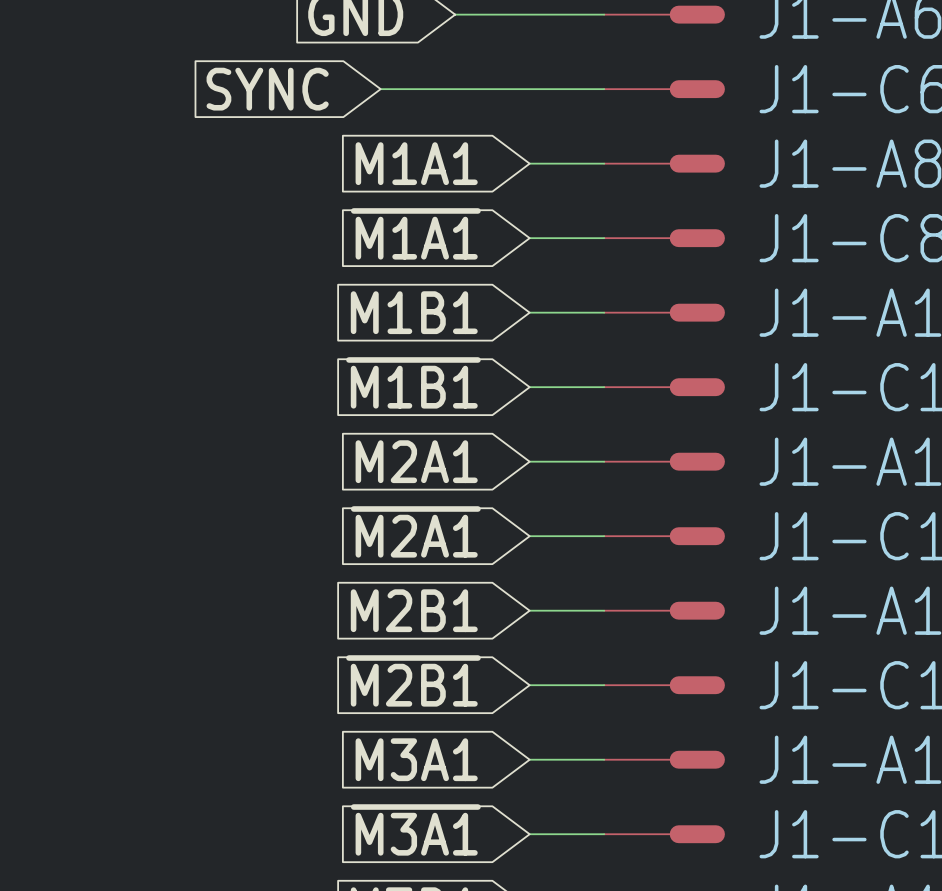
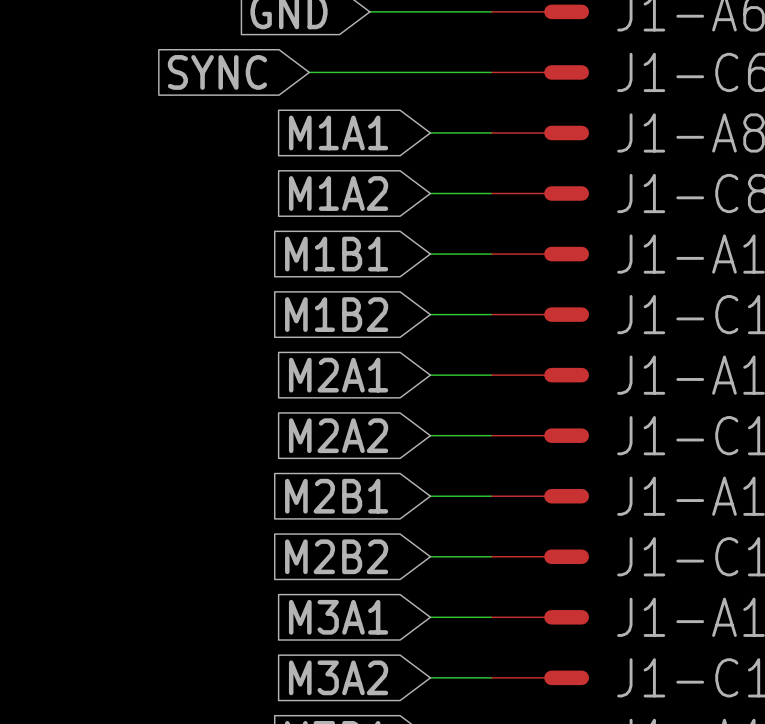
global label: ~{M1A1} (415, 233) -> M1A2 (338, 193)
global label: ~{M1B1} (413, 382) -> M1B2 (336, 314)
global label: ~{M2A1} (415, 531) -> M2A2 (338, 435)
global label: ~{M2B1} (413, 680) -> M2B2 (336, 556)
global label: ~{M3A1} (415, 829) -> M3A2 (338, 677)

